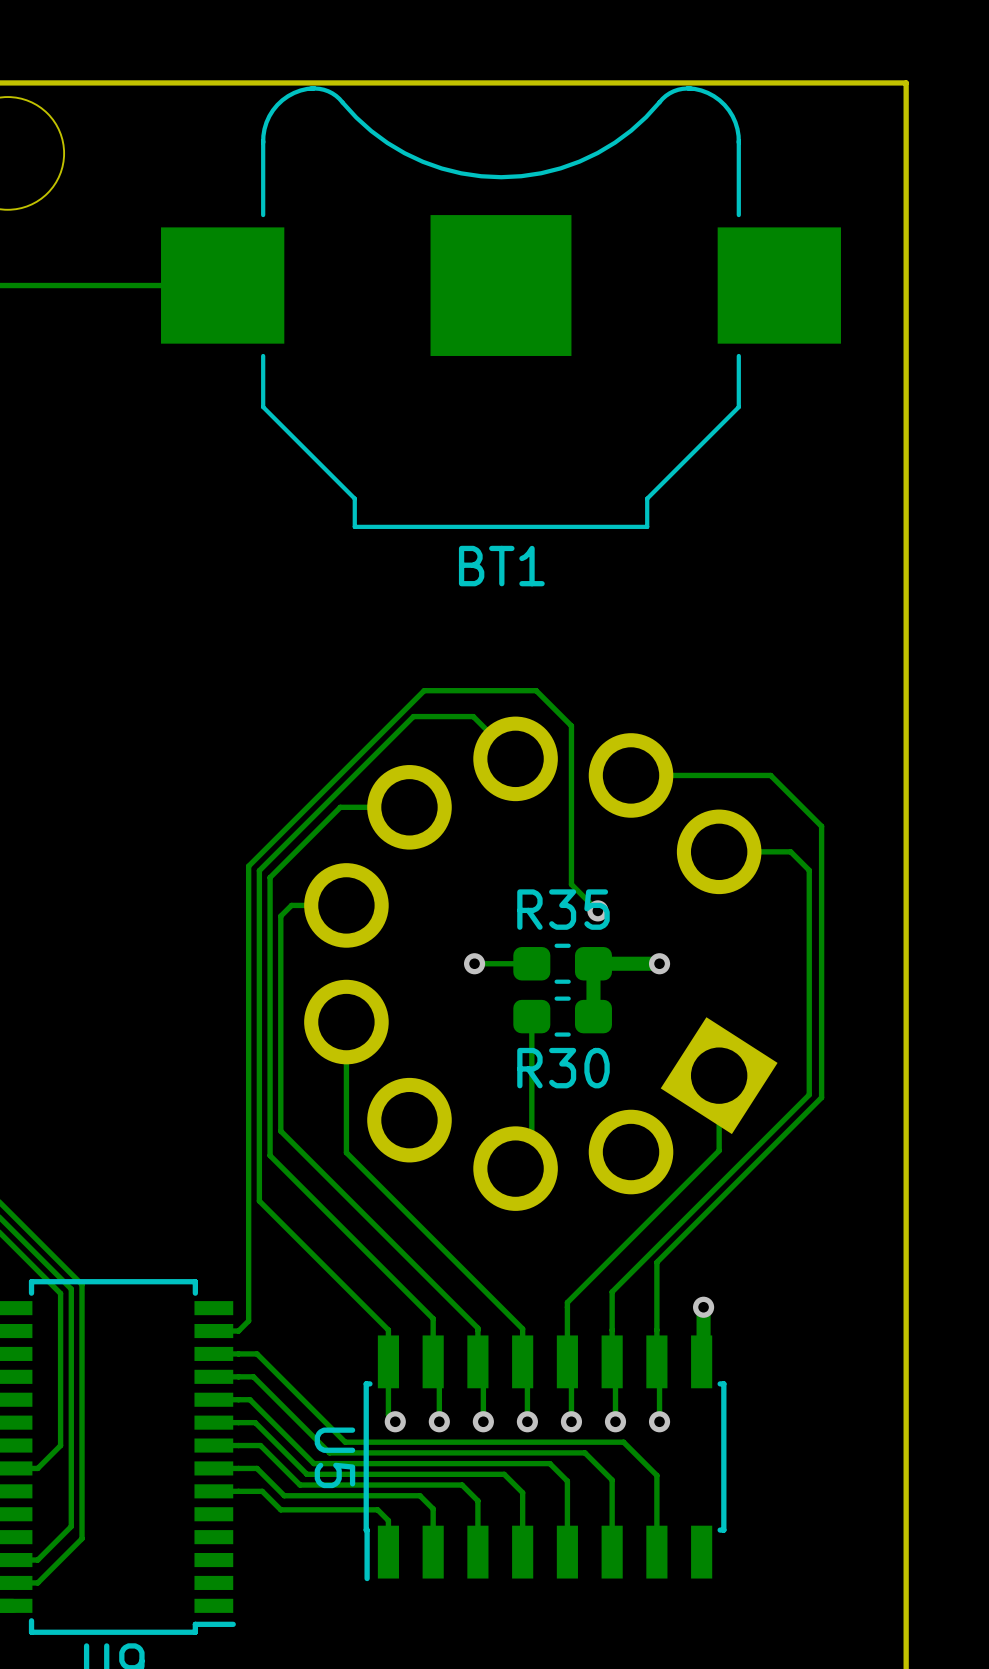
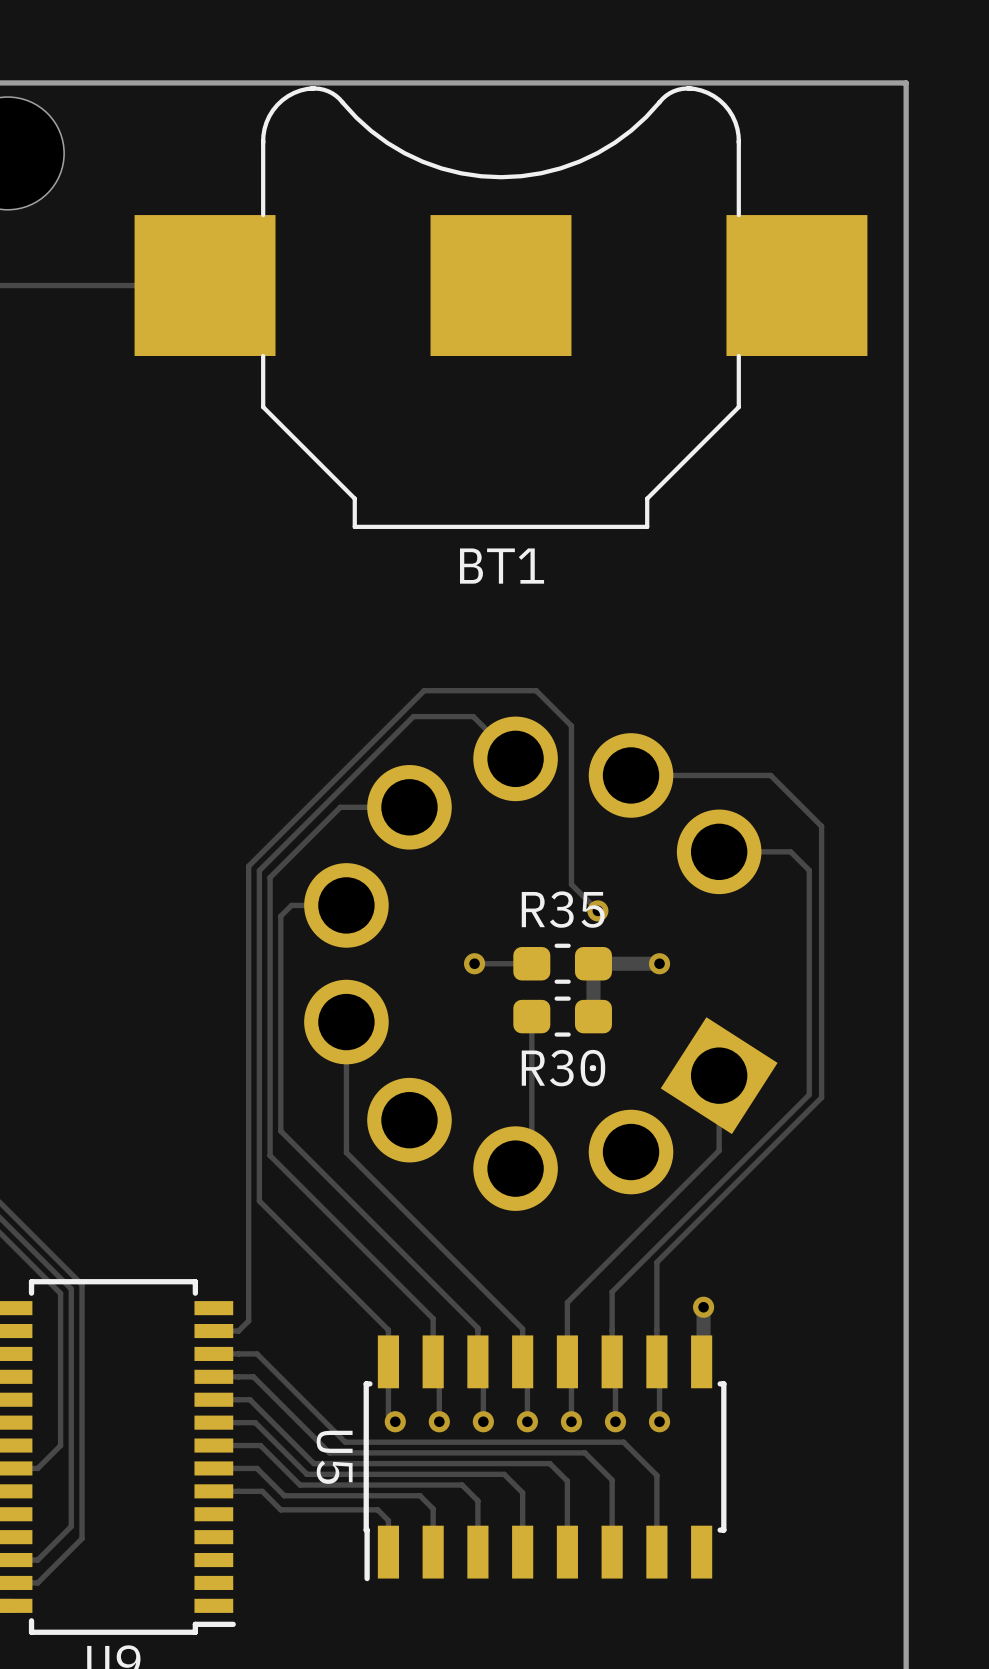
BT1 footprint: [161, 86, 841, 529] -> [134, 86, 868, 529]

